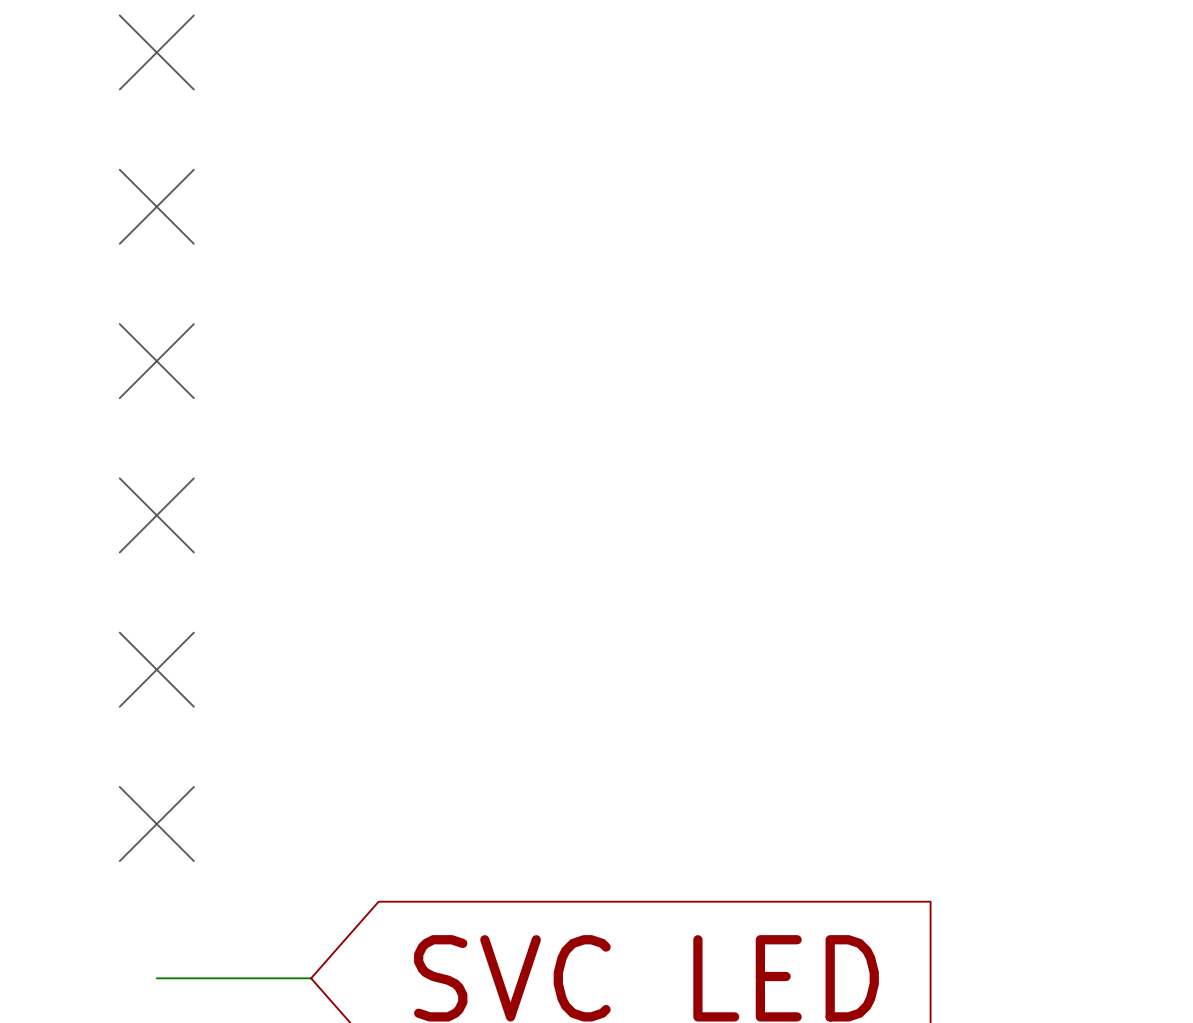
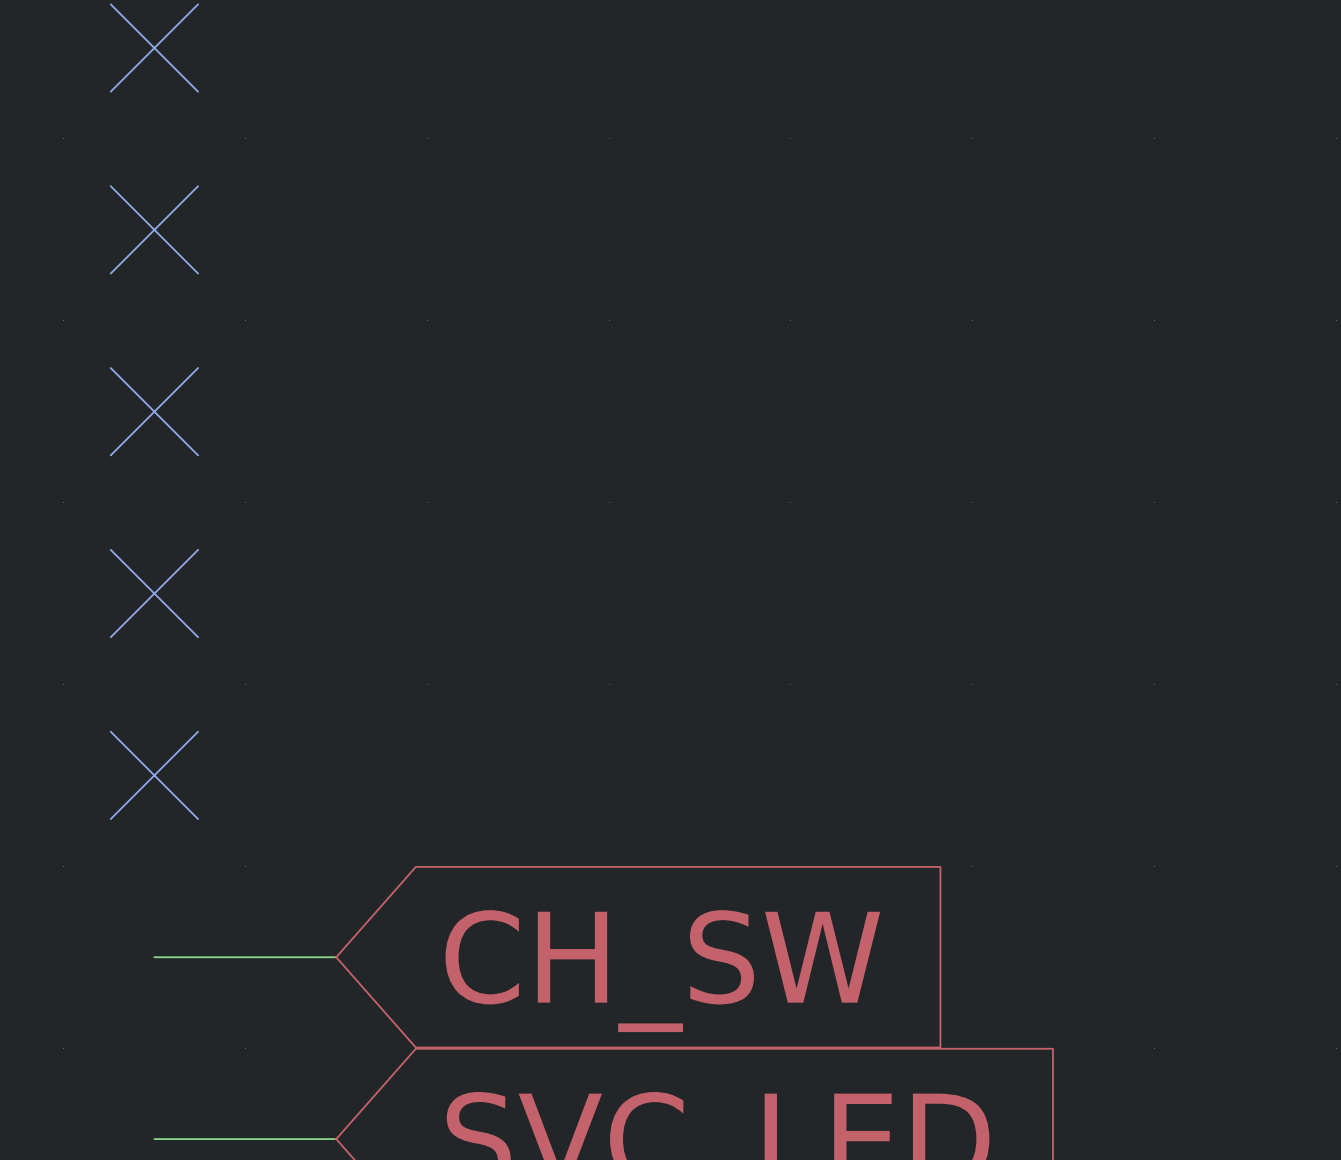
wire: none -> (154, 957) (336, 957)
no-connect mark: (156, 824) -> none
global label: none -> CH_SW (662, 971)

